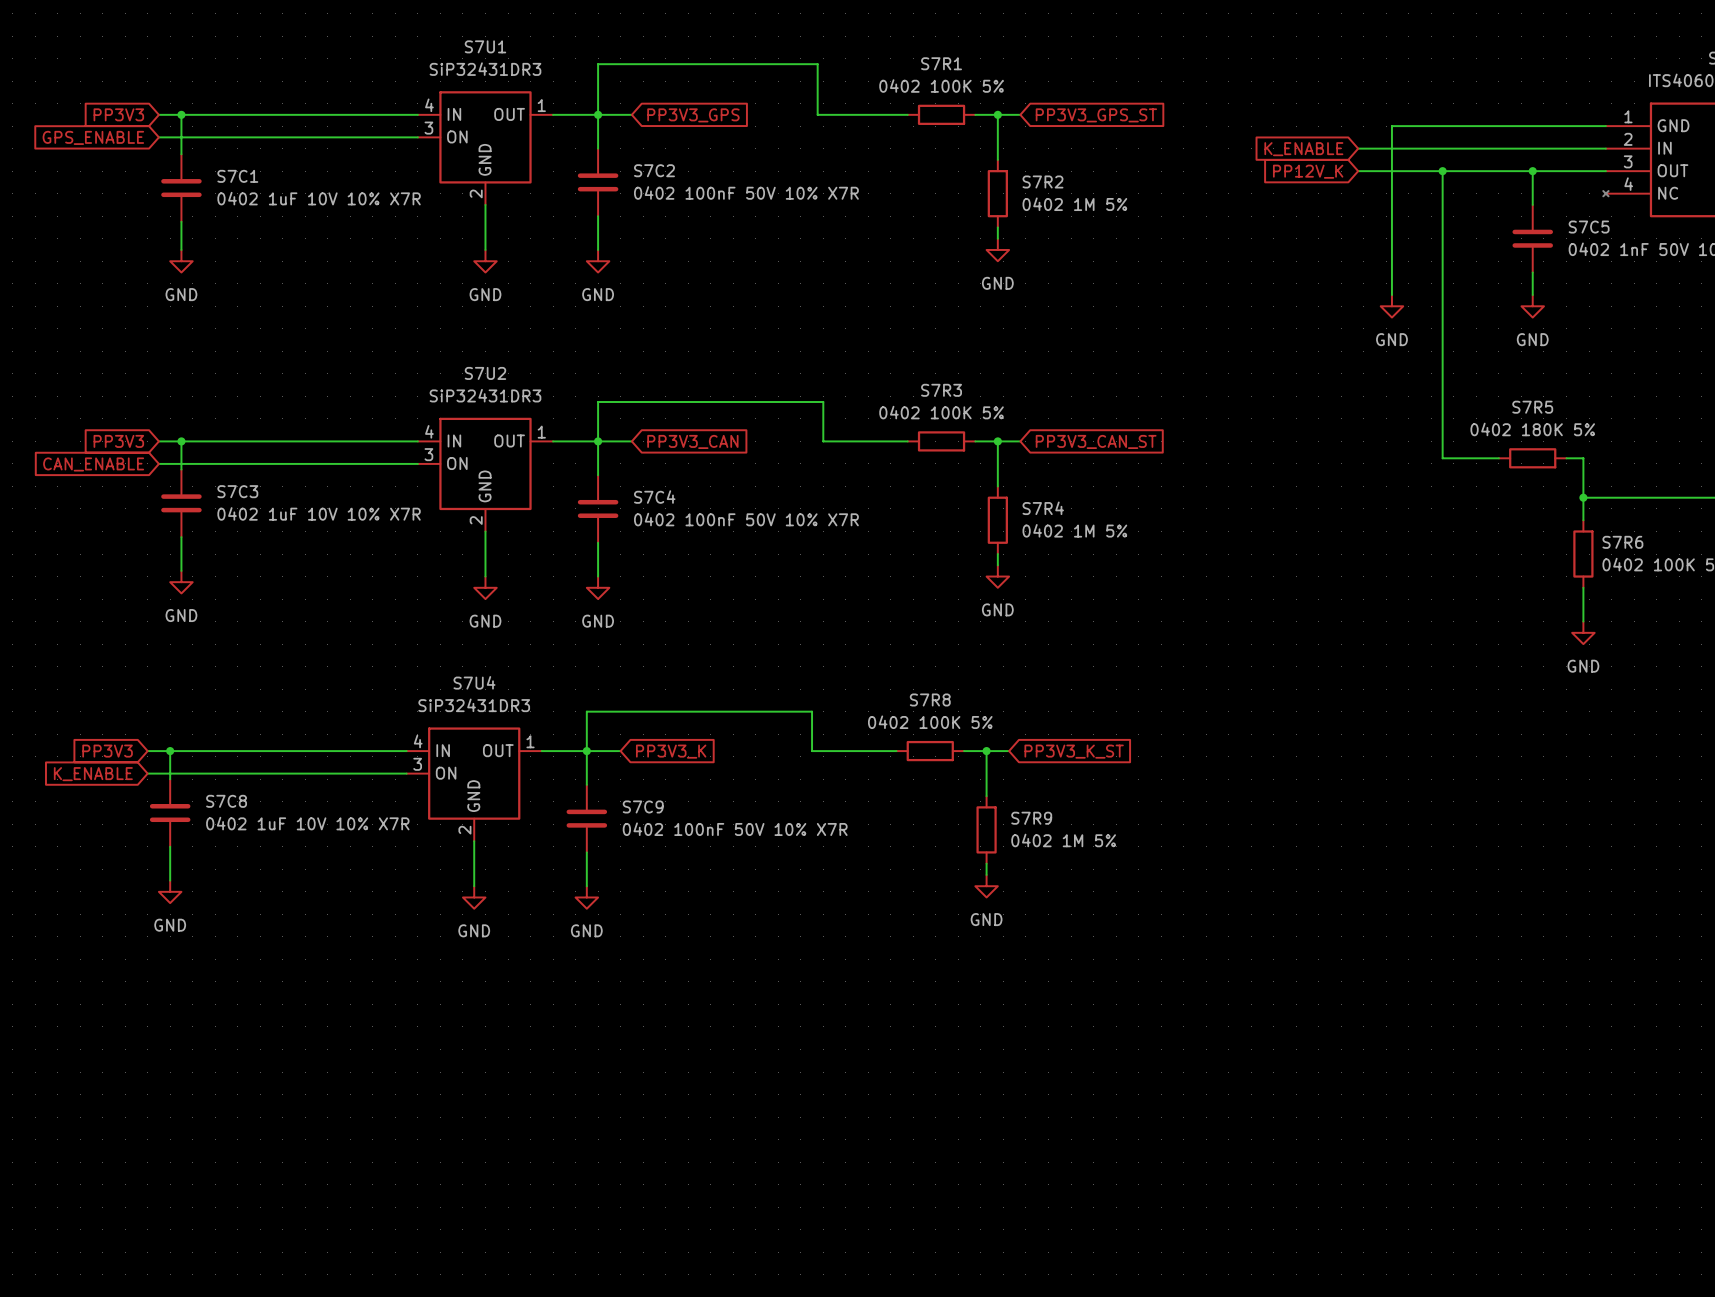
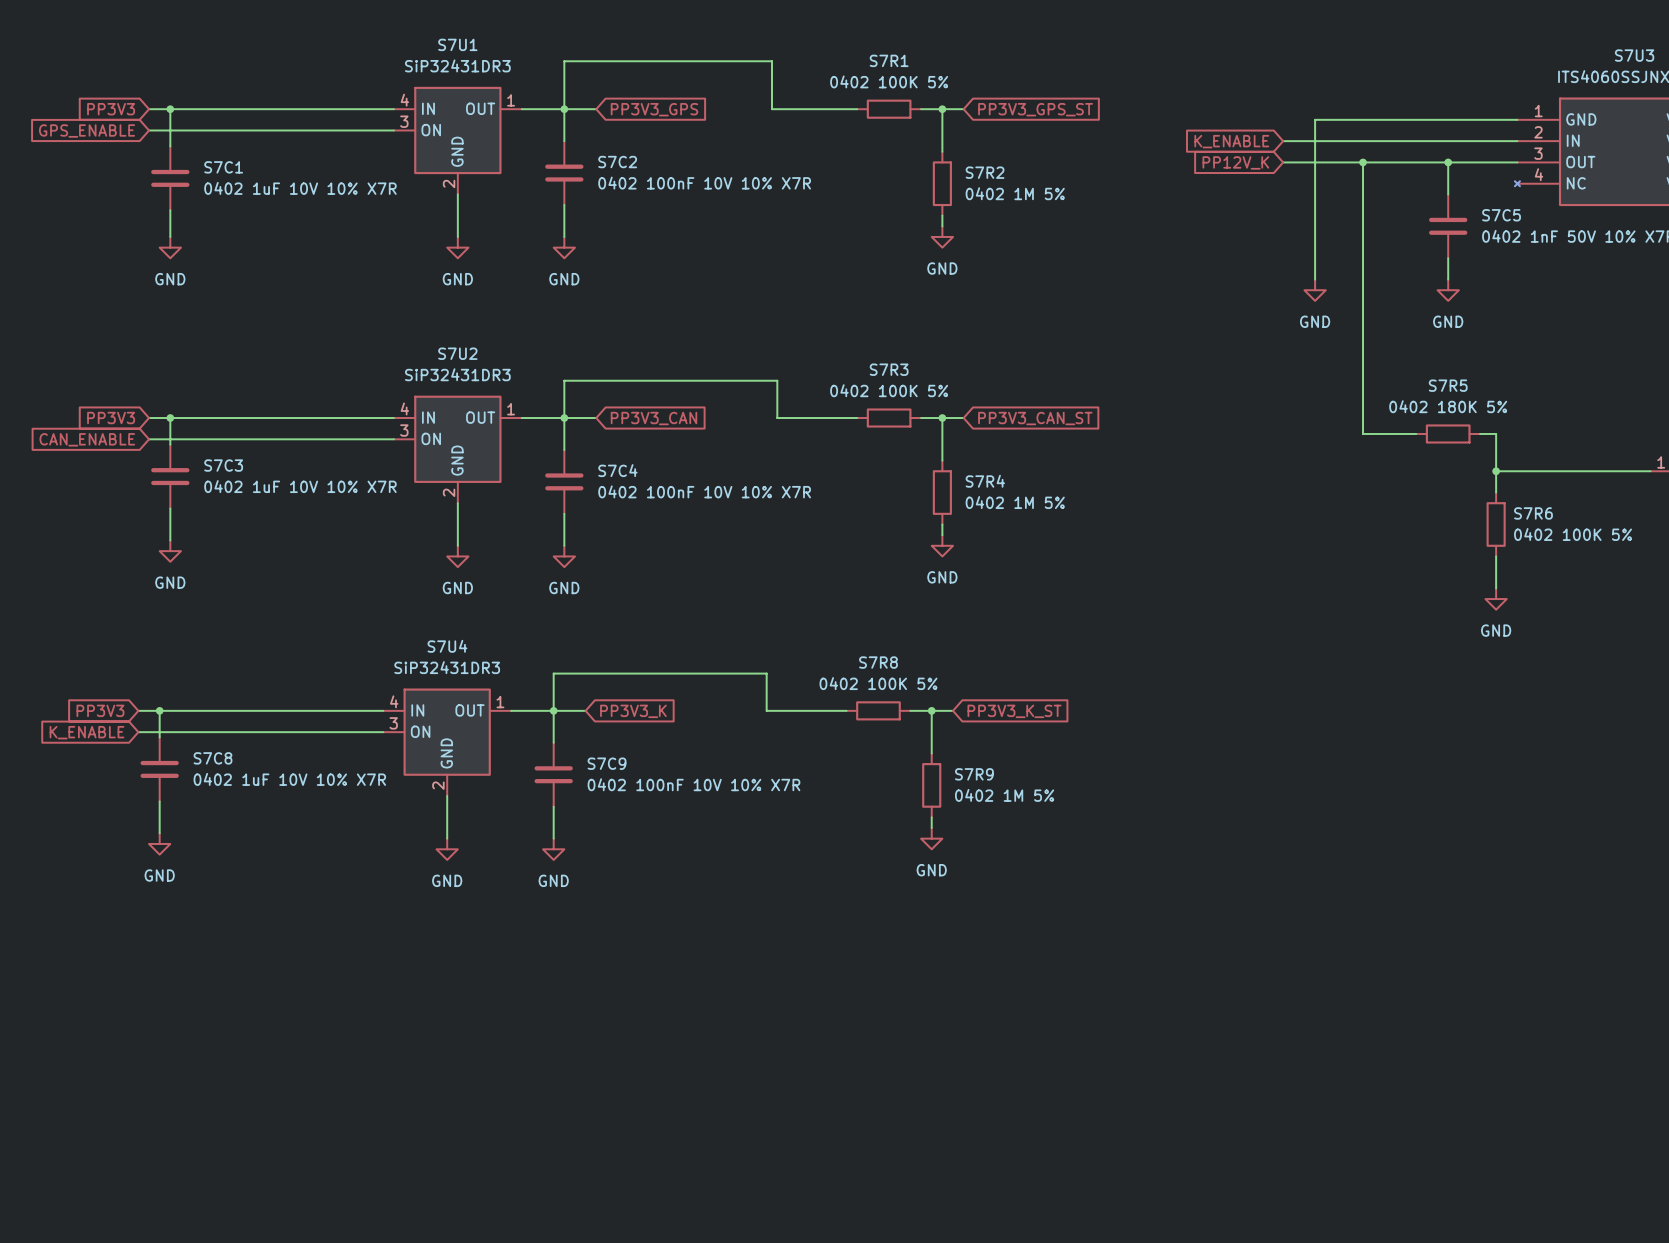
S7C2 value: 0402 100nF 50V 10% X7R (746, 192) -> 0402 100nF 10V 10% X7R (704, 183)
S7C4 value: 0402 100nF 50V 10% X7R (746, 519) -> 0402 100nF 10V 10% X7R (704, 491)
S7C9 value: 0402 100nF 50V 10% X7R (735, 829) -> 0402 100nF 10V 10% X7R (693, 784)

